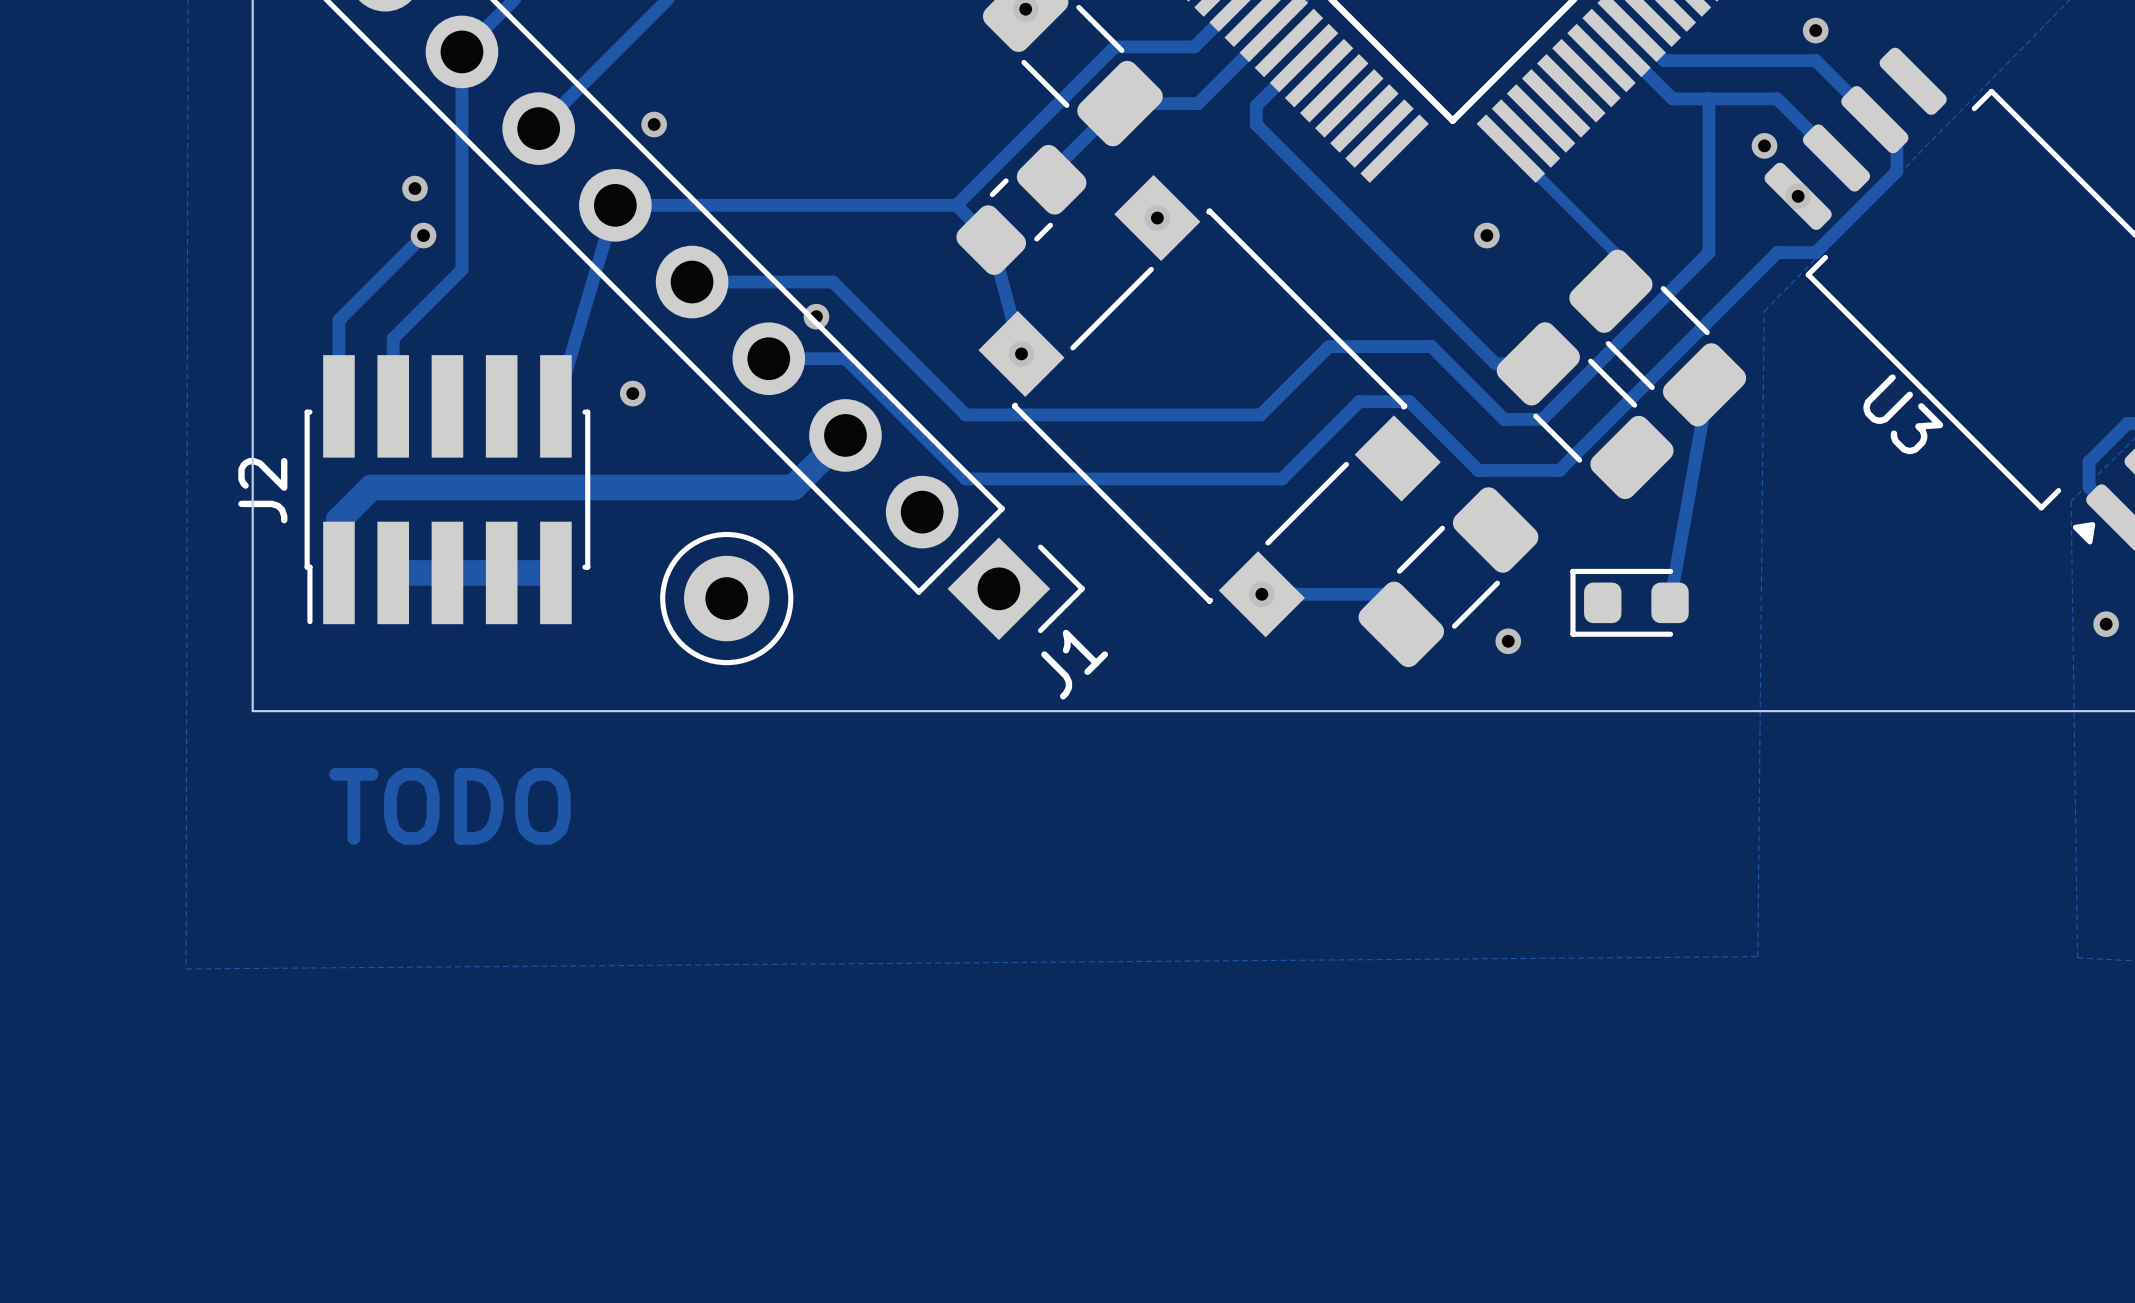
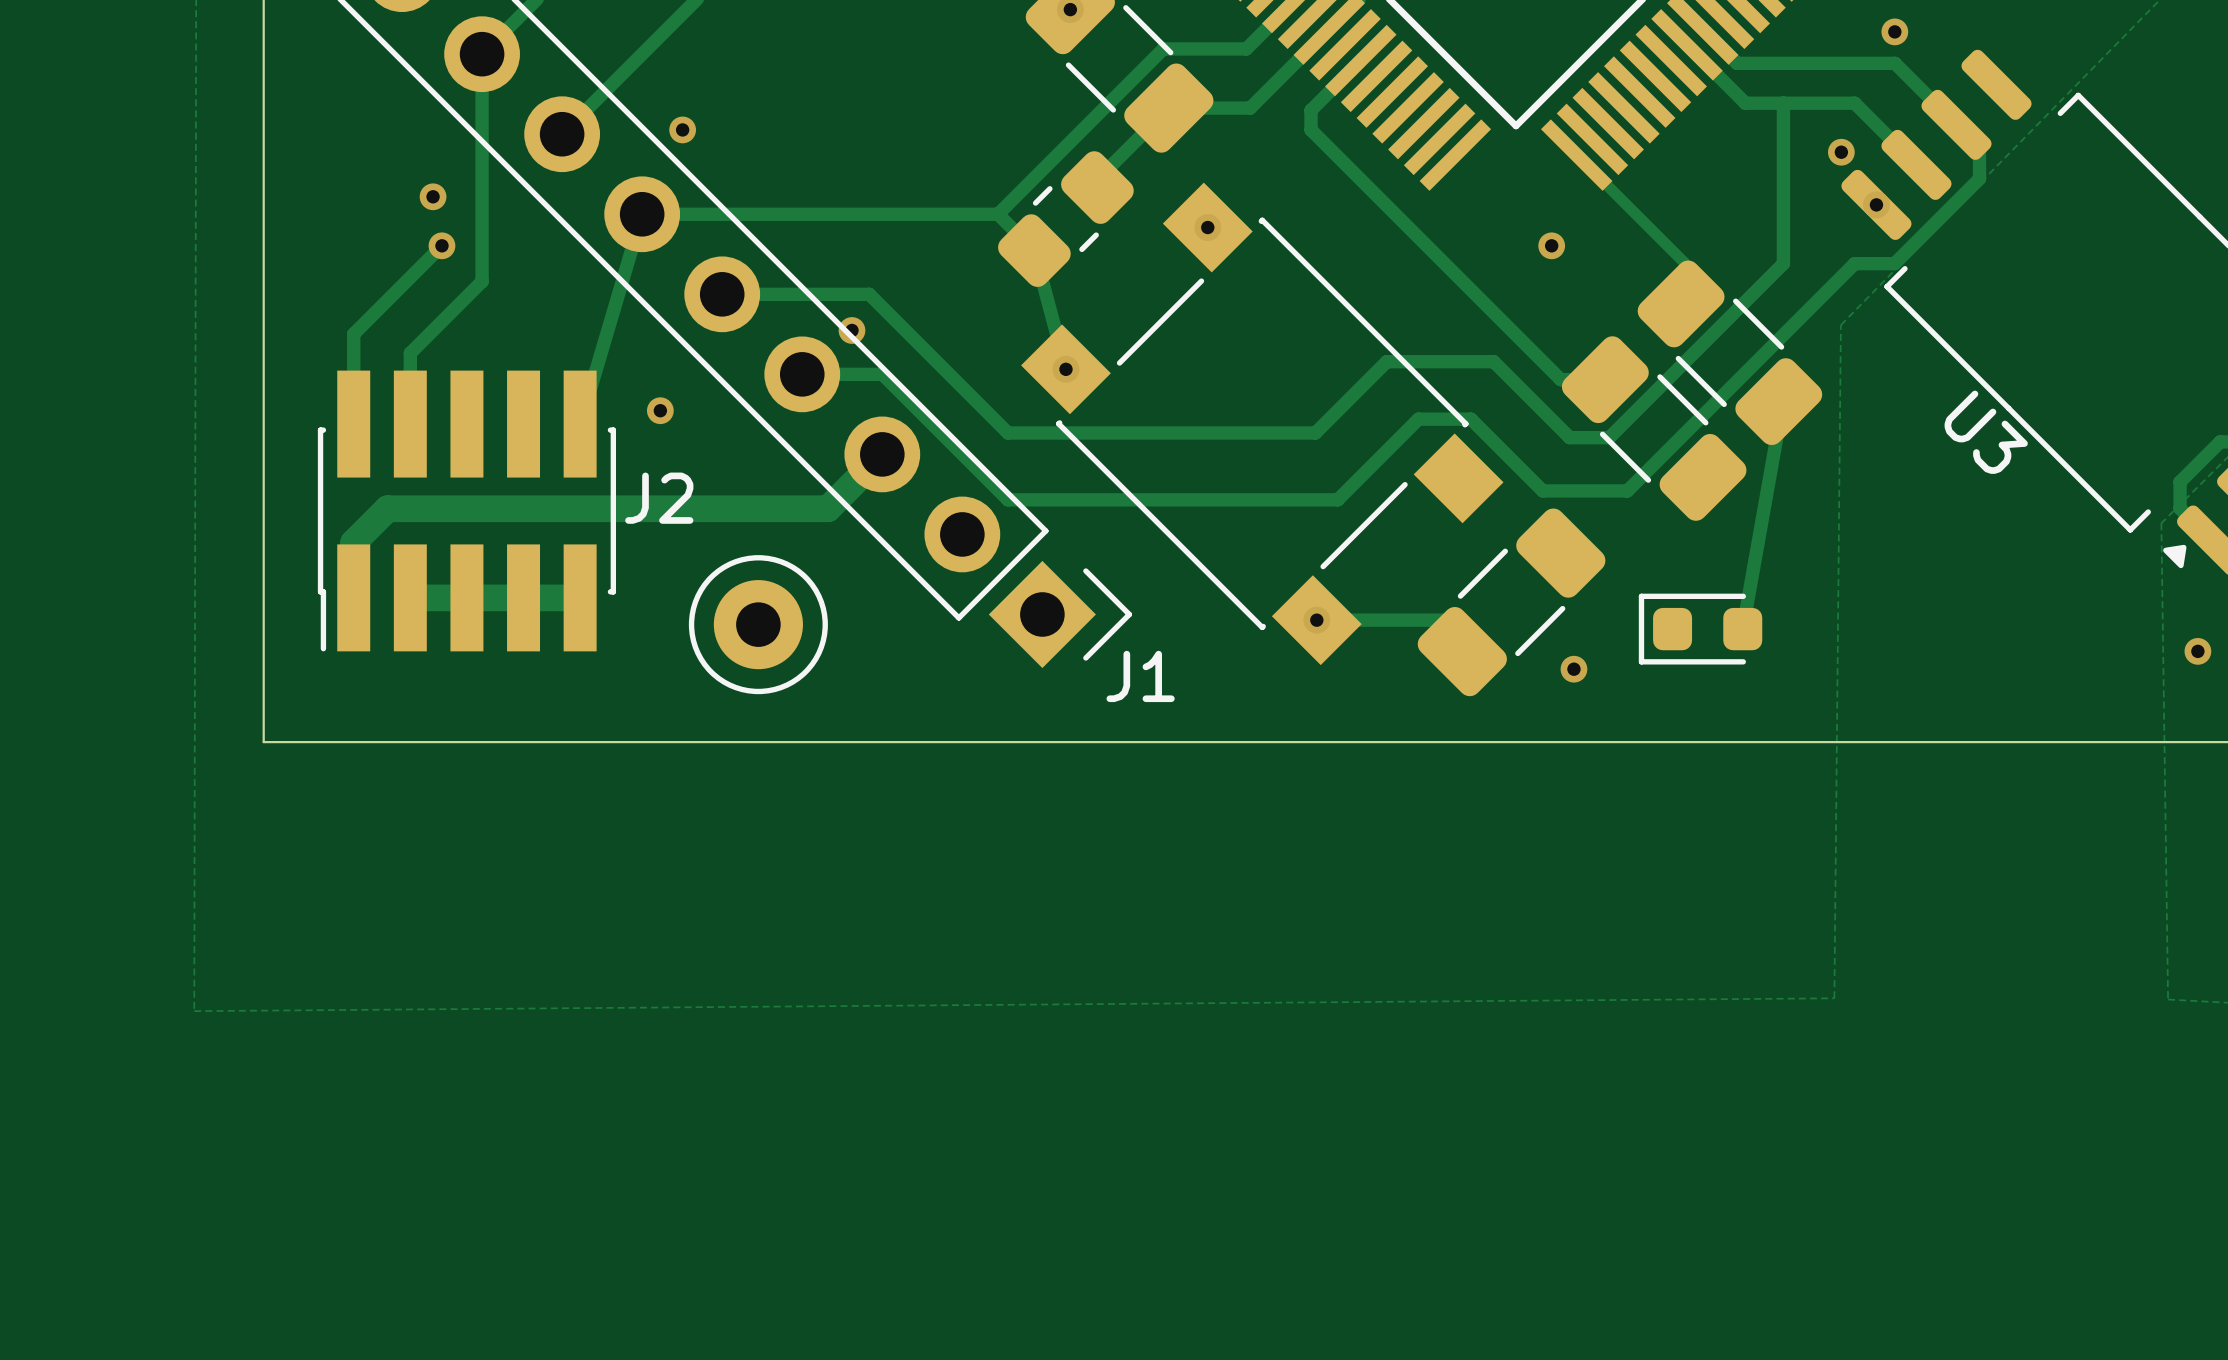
J2 name rotation: 0° (262, 490) -> 90° clockwise (659, 498)
J2 name position: J2 (262, 490) -> J2 (659, 498)
J1 name rotation: 0° (1074, 664) -> 45° clockwise (1140, 676)
text: TODO (449, 806) -> none

